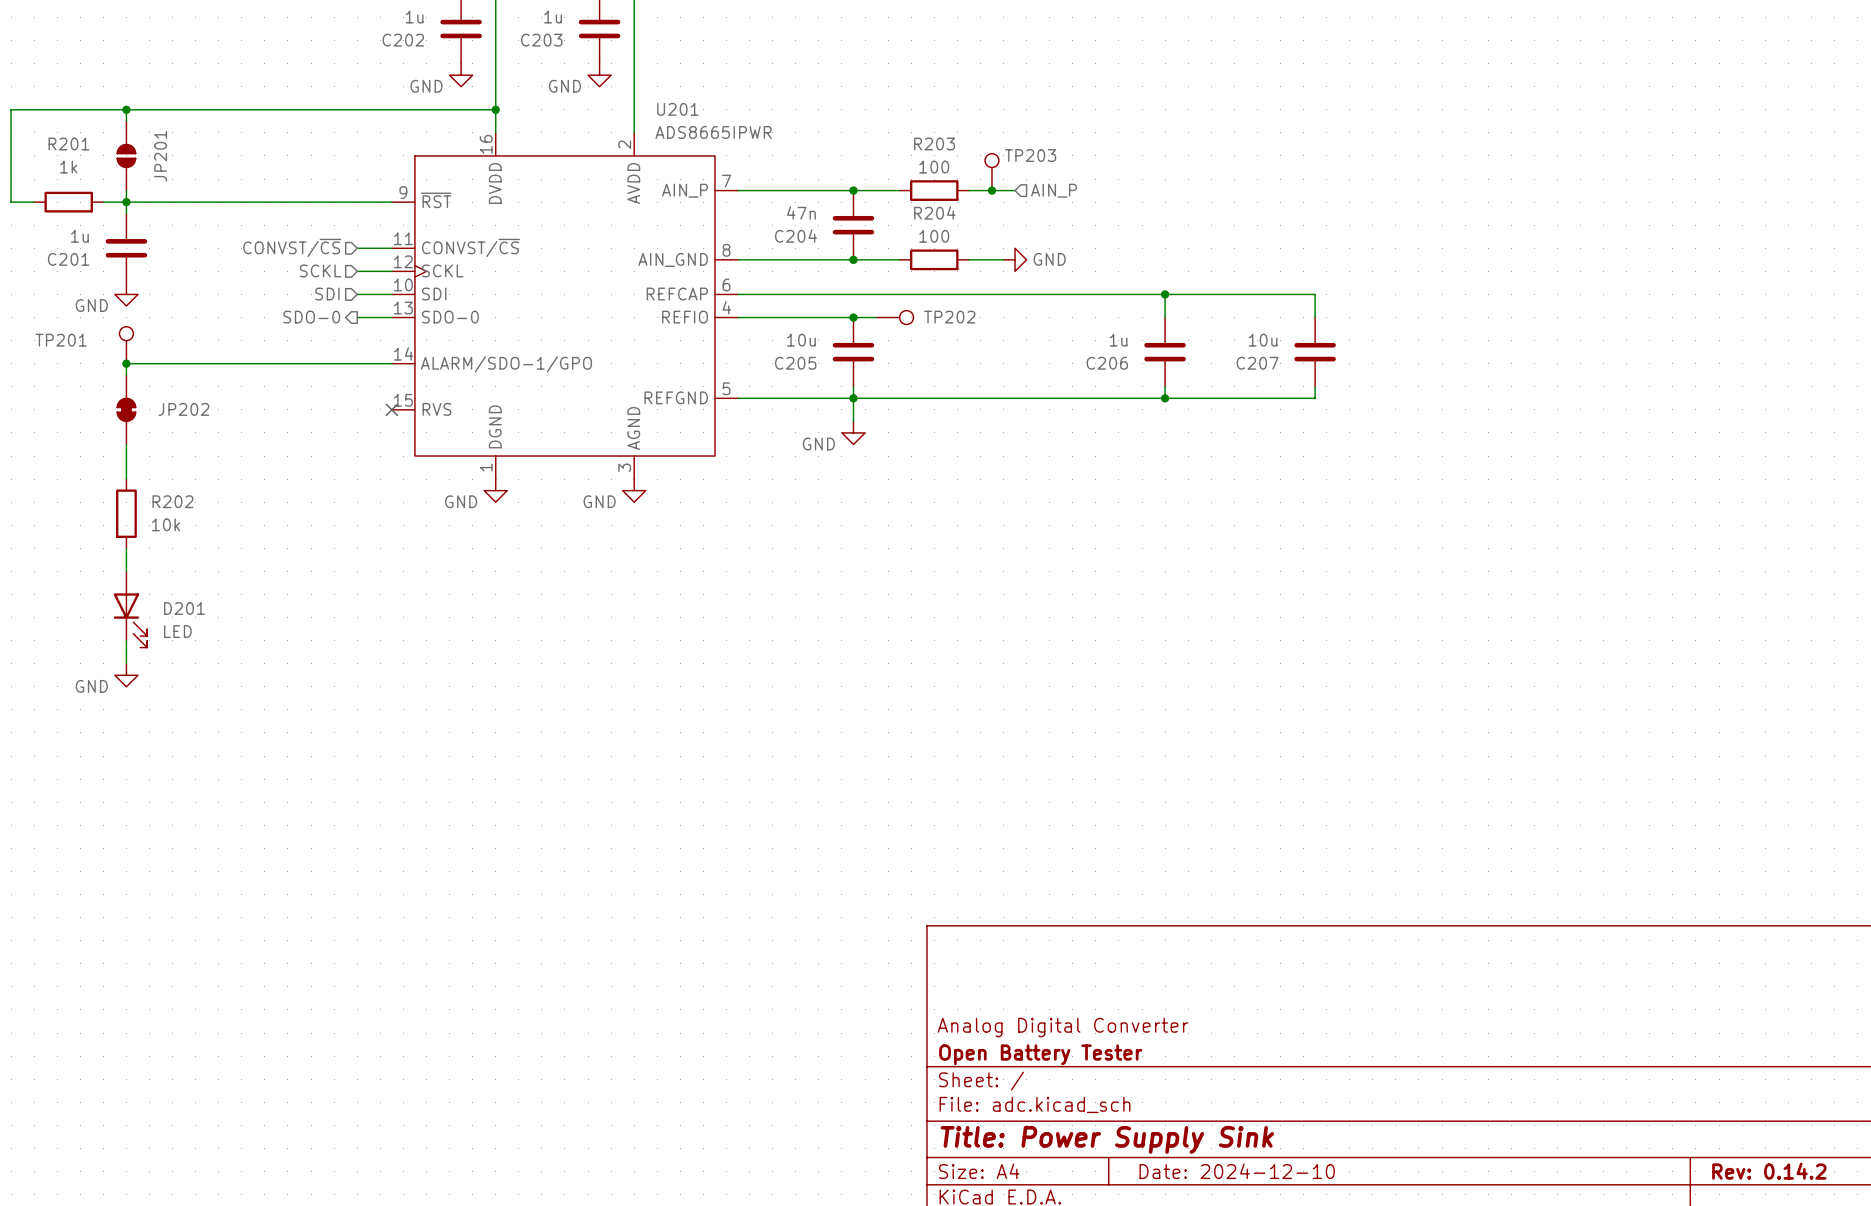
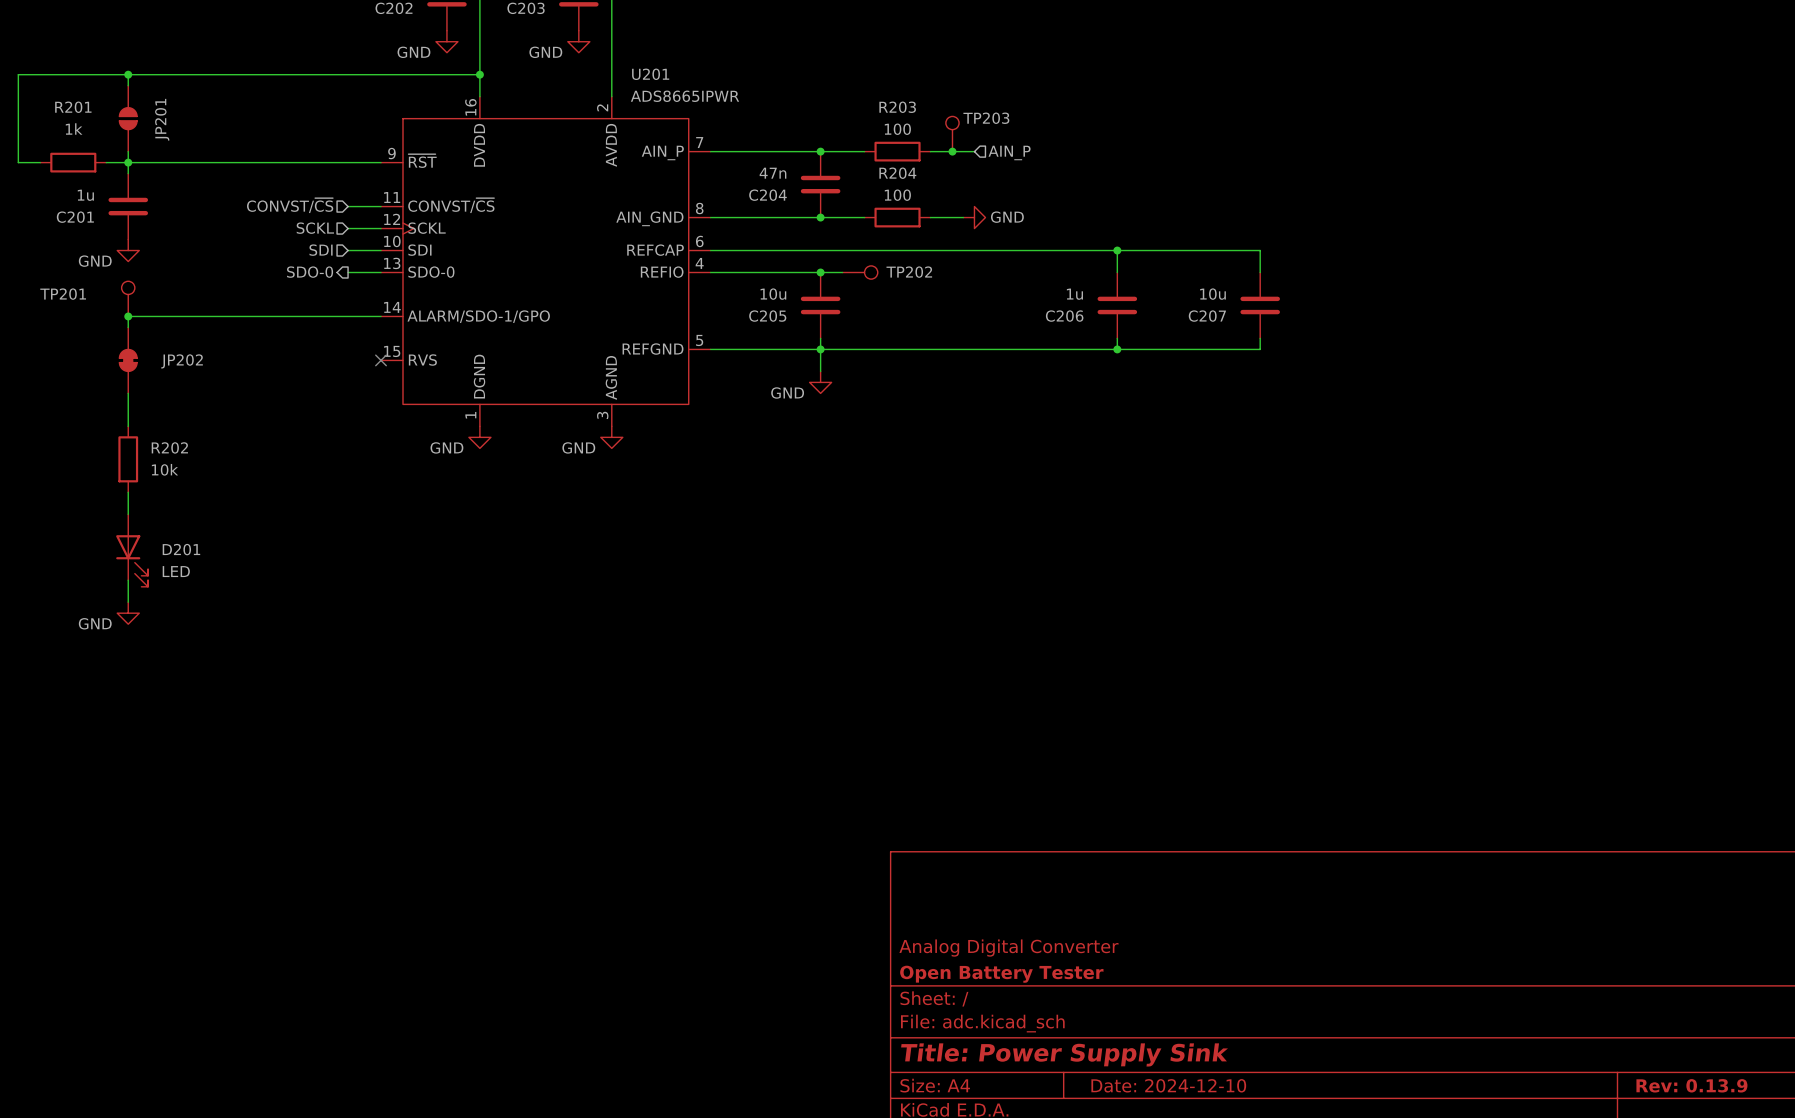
title block: Rev: 0.14.2 (1769, 1171) -> Rev: 0.13.9 (1691, 1085)

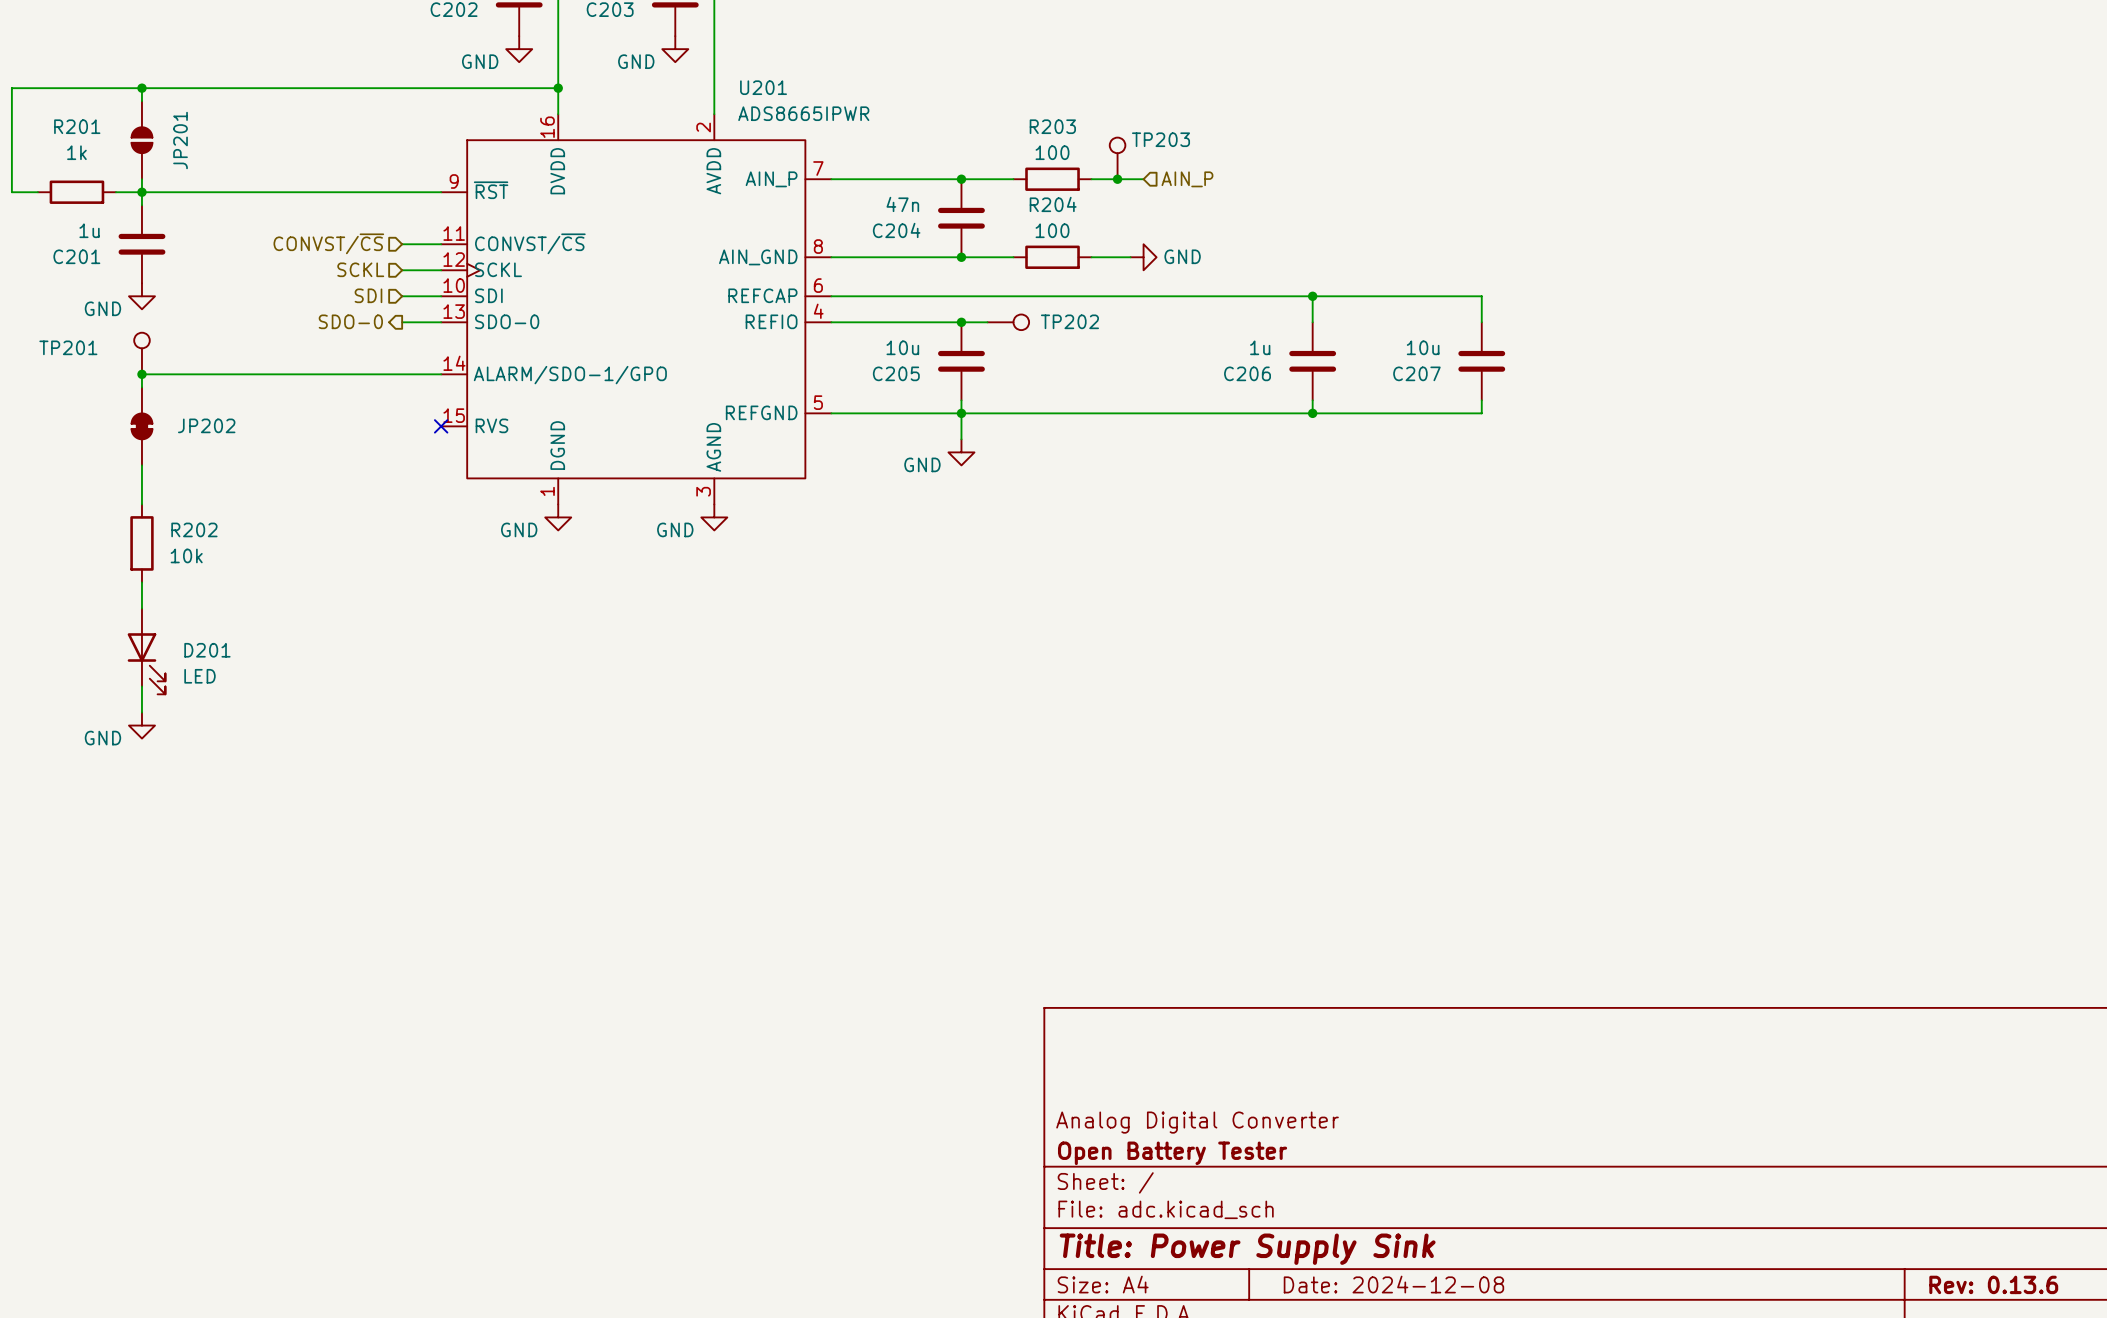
title block: Date: 2024-12-10 (1168, 1085) -> Date: 2024-12-08 (1393, 1284)
title block: Rev: 0.13.9 (1691, 1085) -> Rev: 0.13.6 (1993, 1284)

